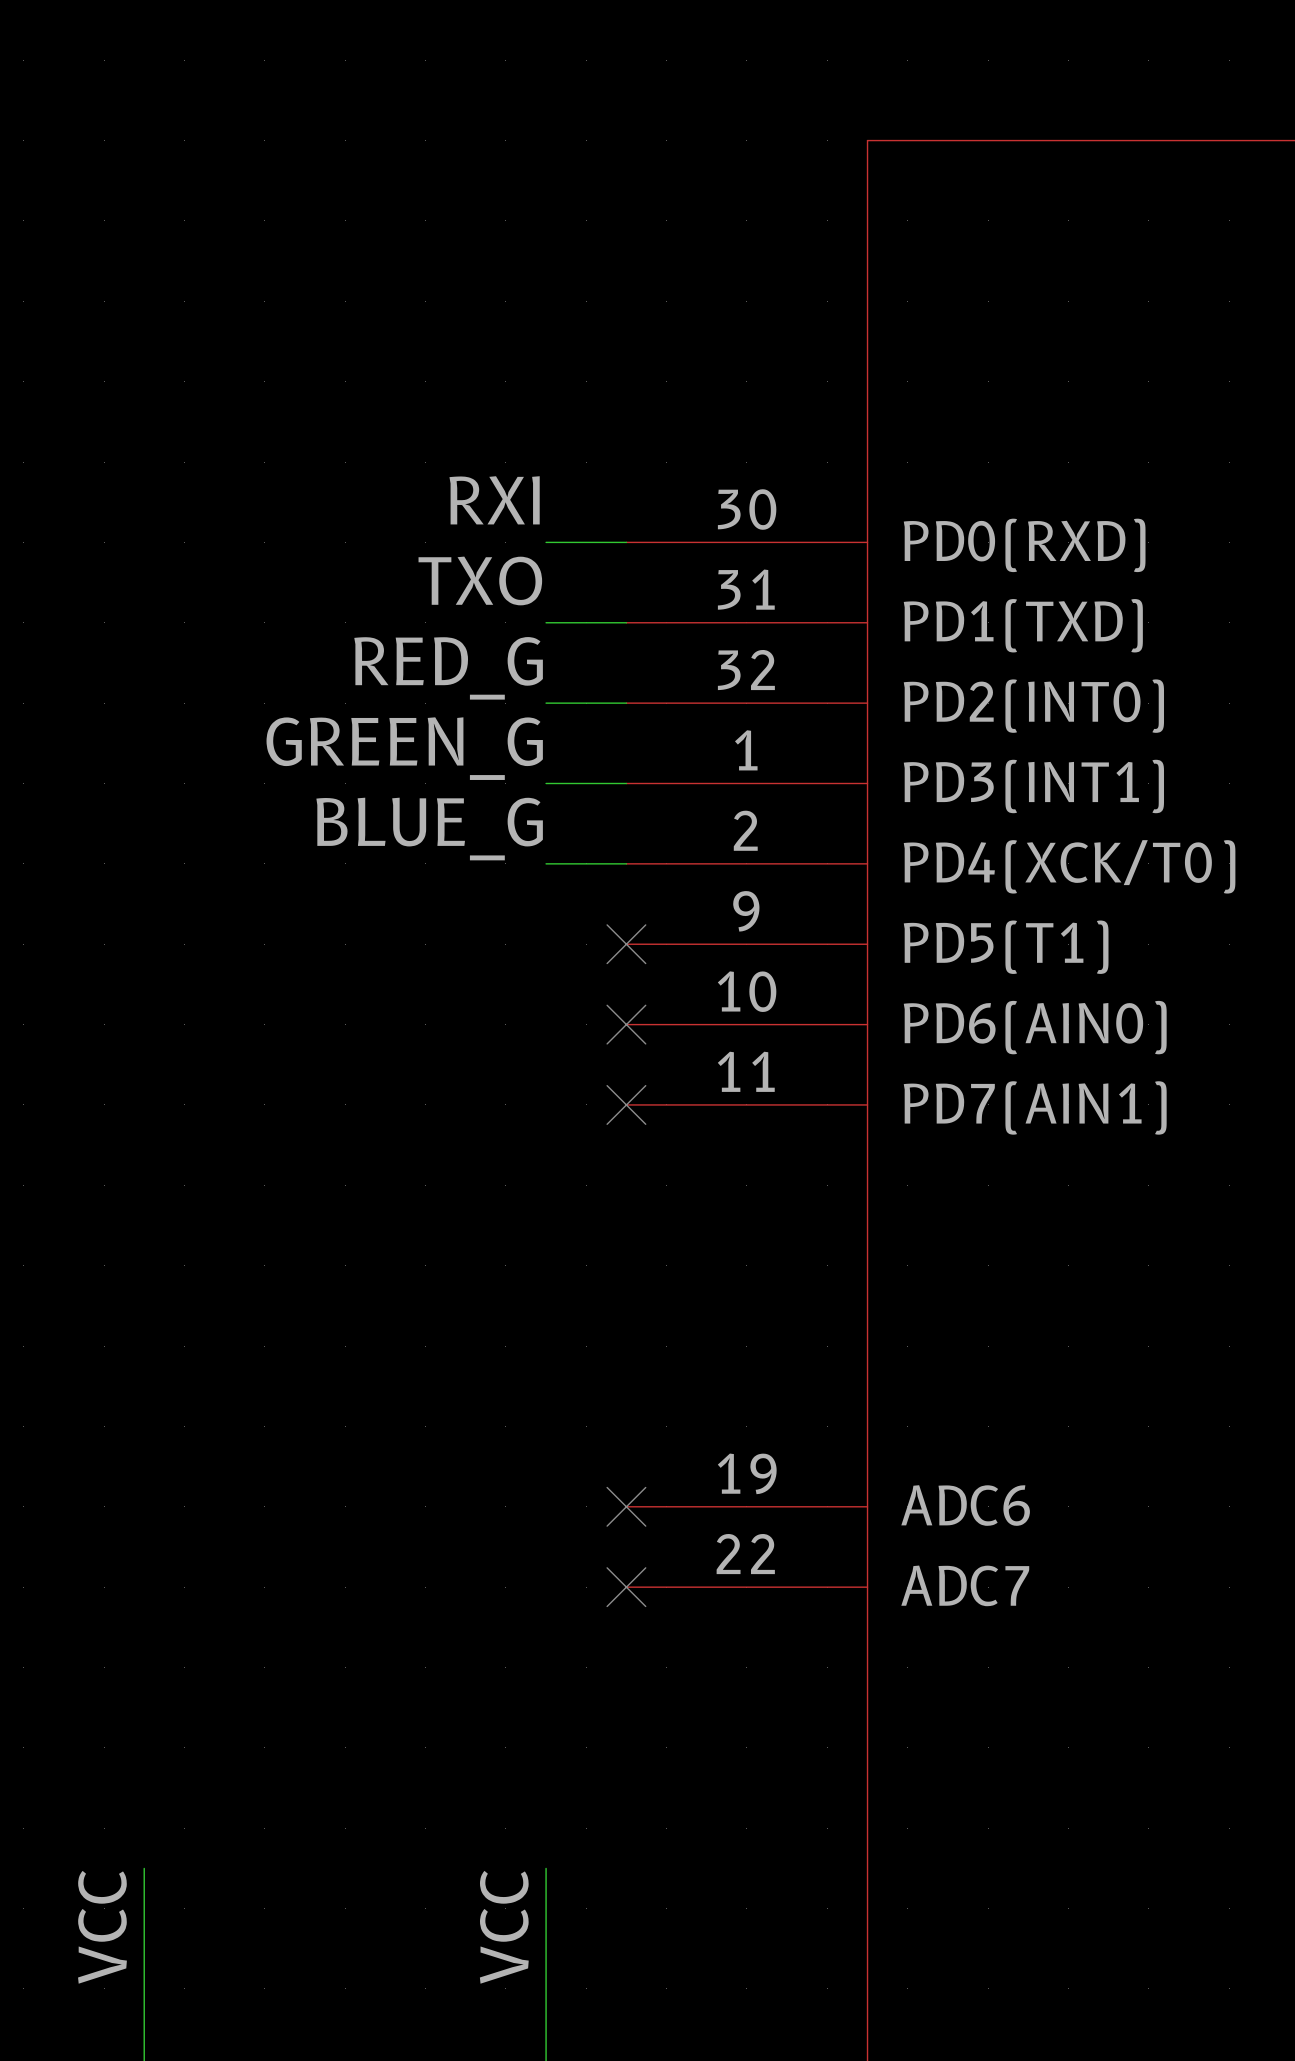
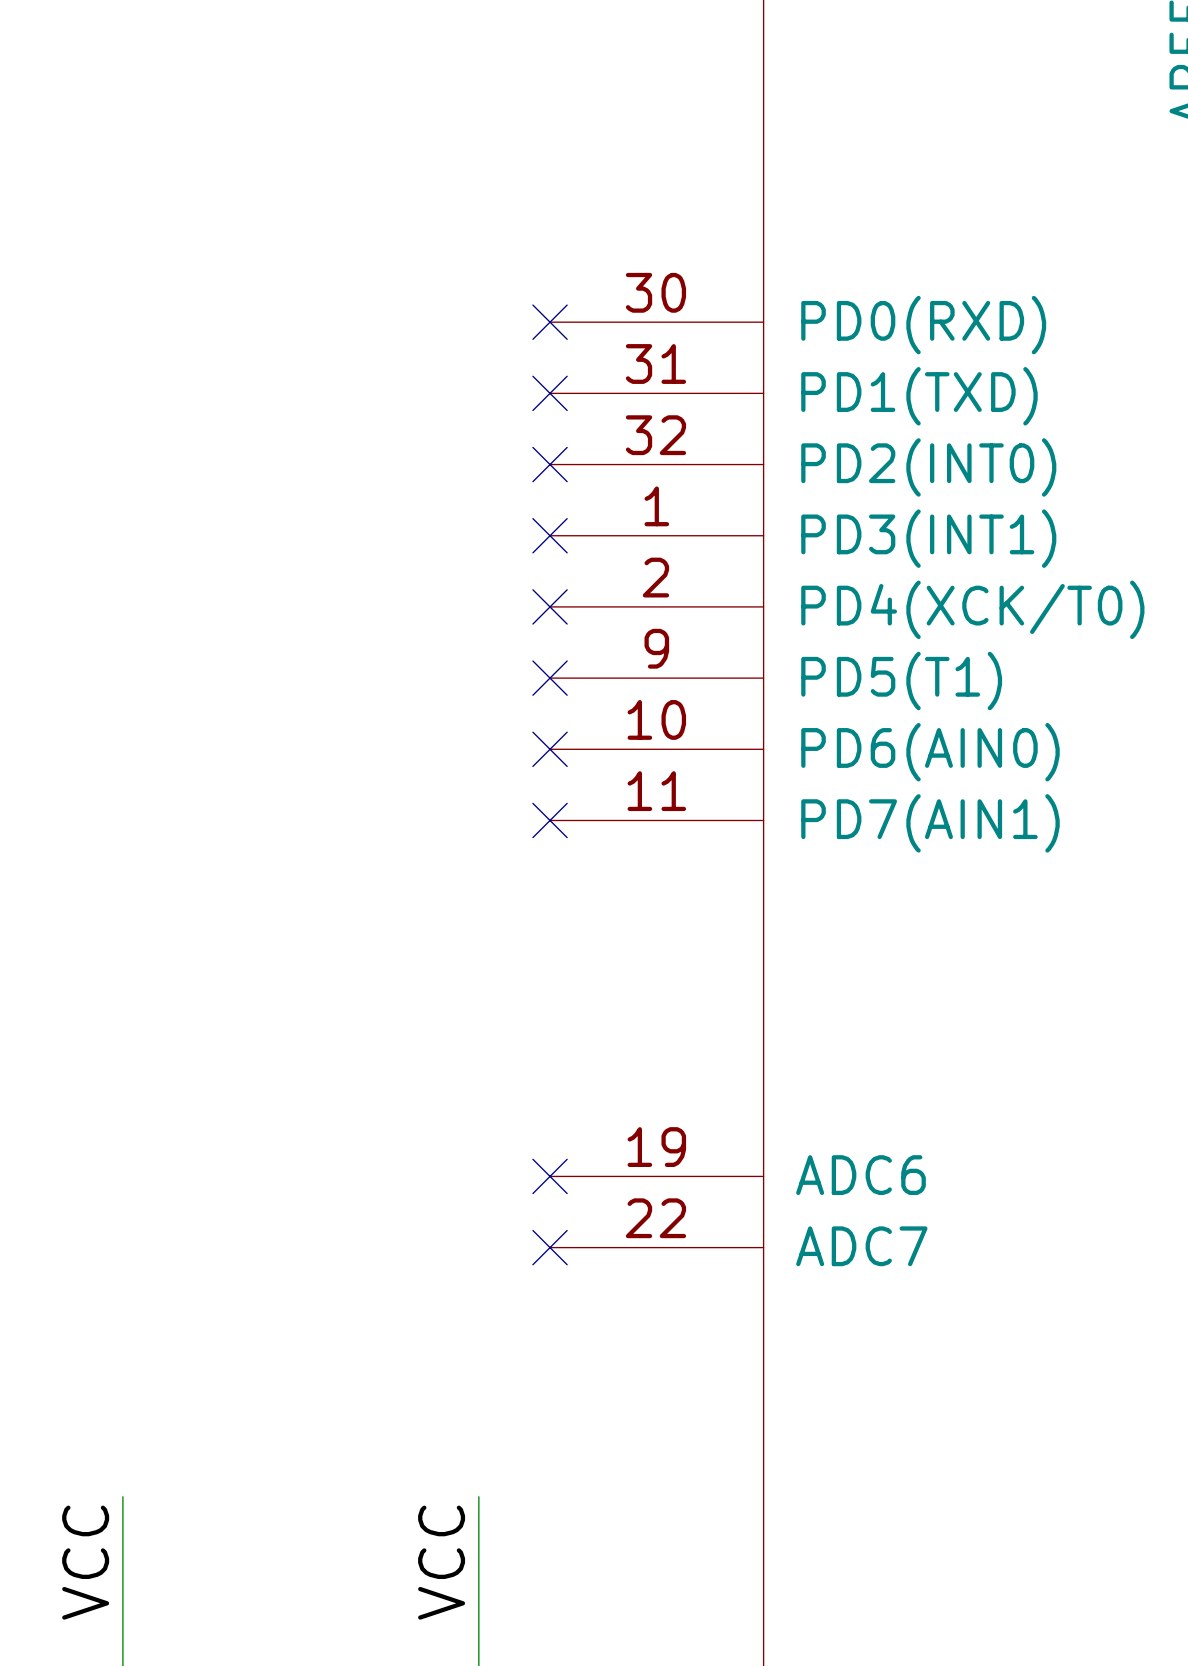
label: RXI (494, 500) -> none
wire: (546, 542) (626, 542) -> none
no-connect mark: none -> (550, 322)
label: TXO (480, 580) -> none
wire: (546, 622) (626, 622) -> none
no-connect mark: none -> (550, 393)
label: RED_G (448, 668) -> none
wire: (546, 703) (626, 703) -> none
no-connect mark: none -> (550, 464)
label: GREEN_G (404, 748) -> none
wire: (546, 783) (626, 783) -> none
no-connect mark: none -> (550, 535)
label: BLUE_G (429, 829) -> none
wire: (546, 863) (626, 863) -> none
no-connect mark: none -> (550, 606)

